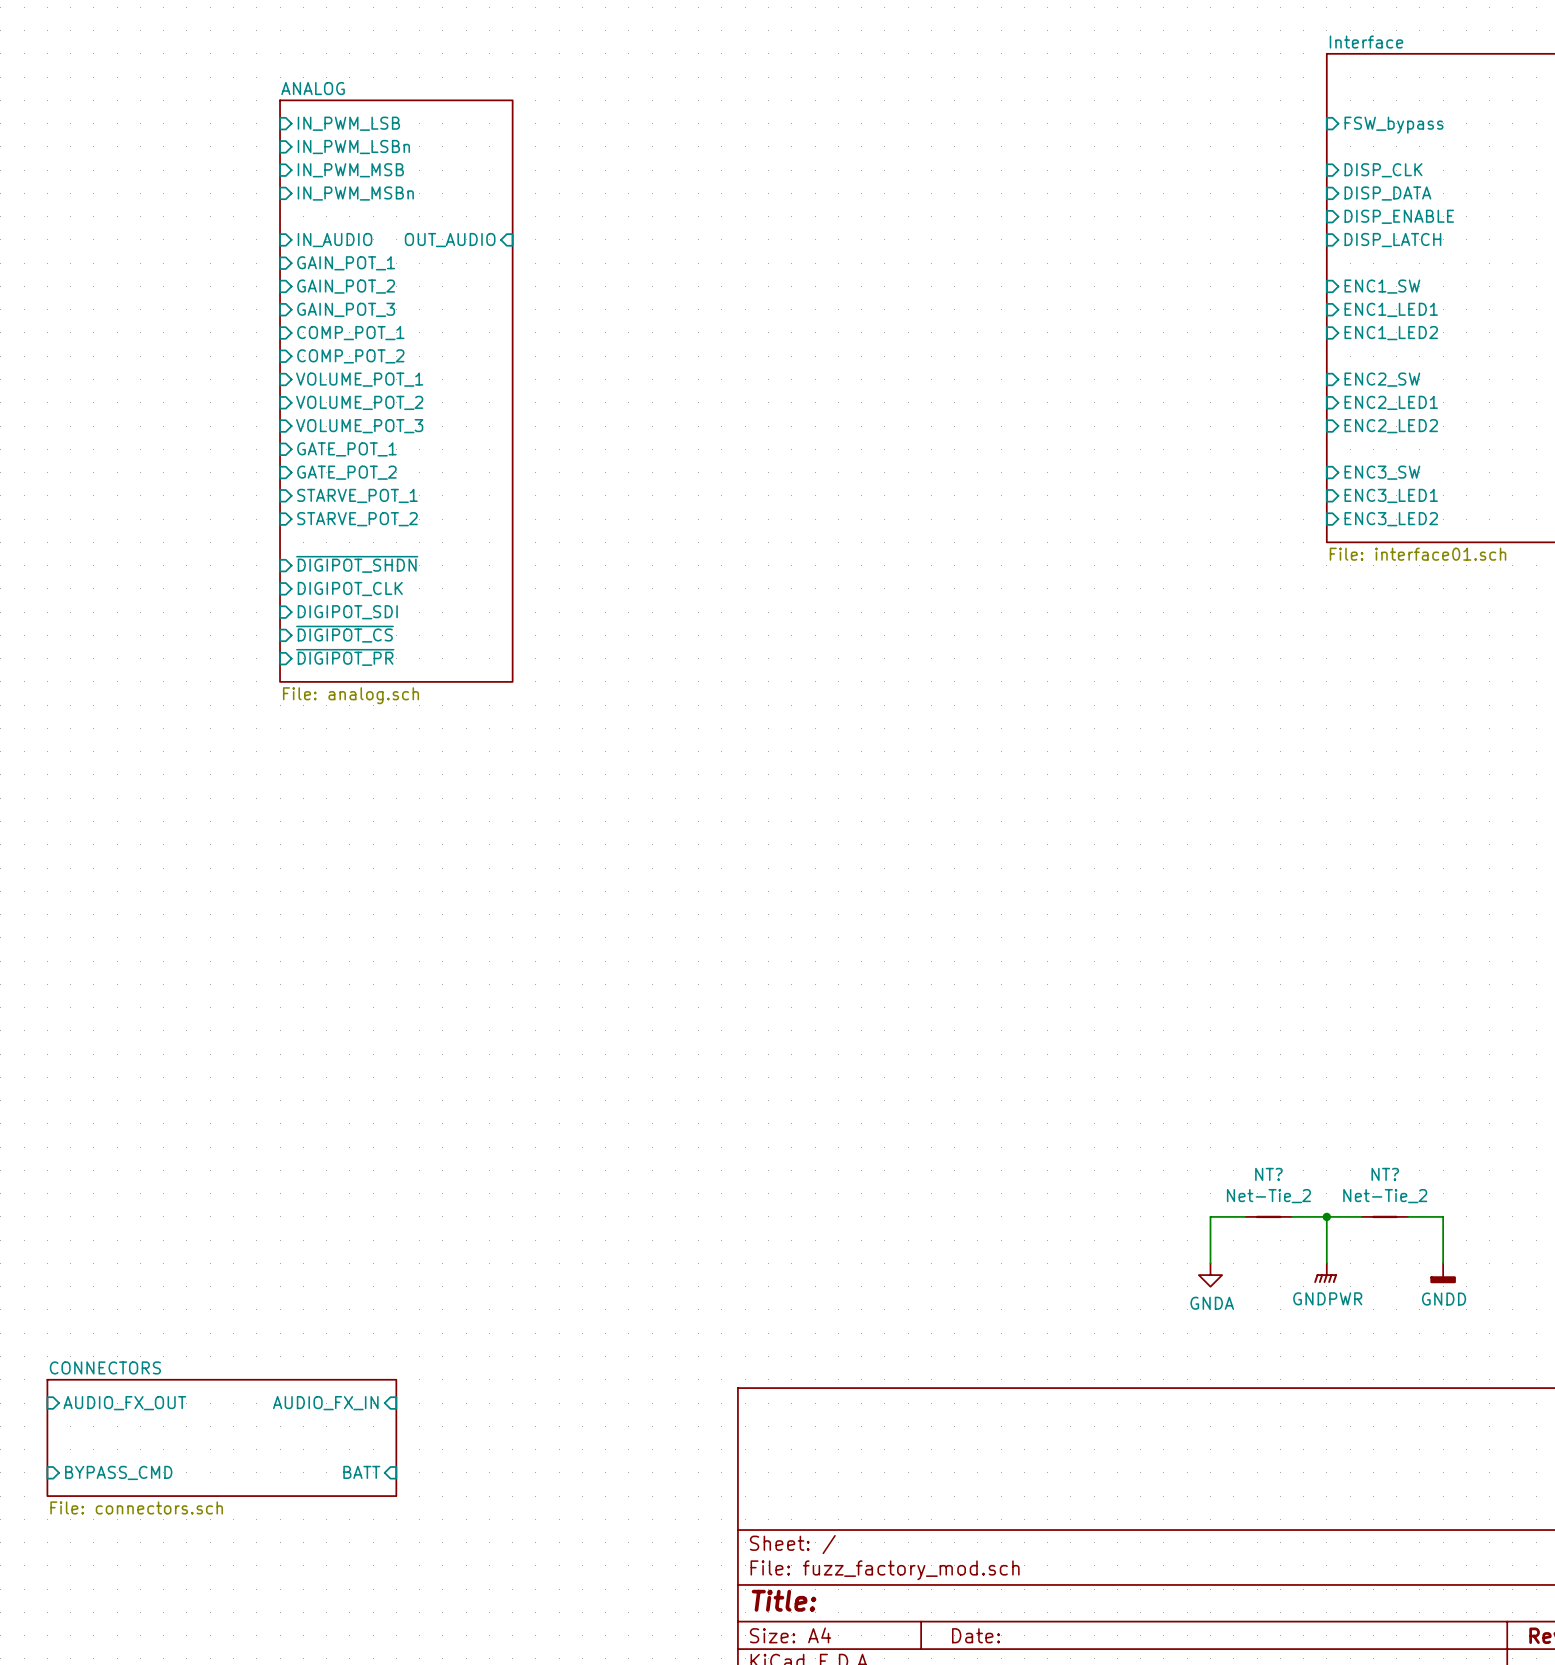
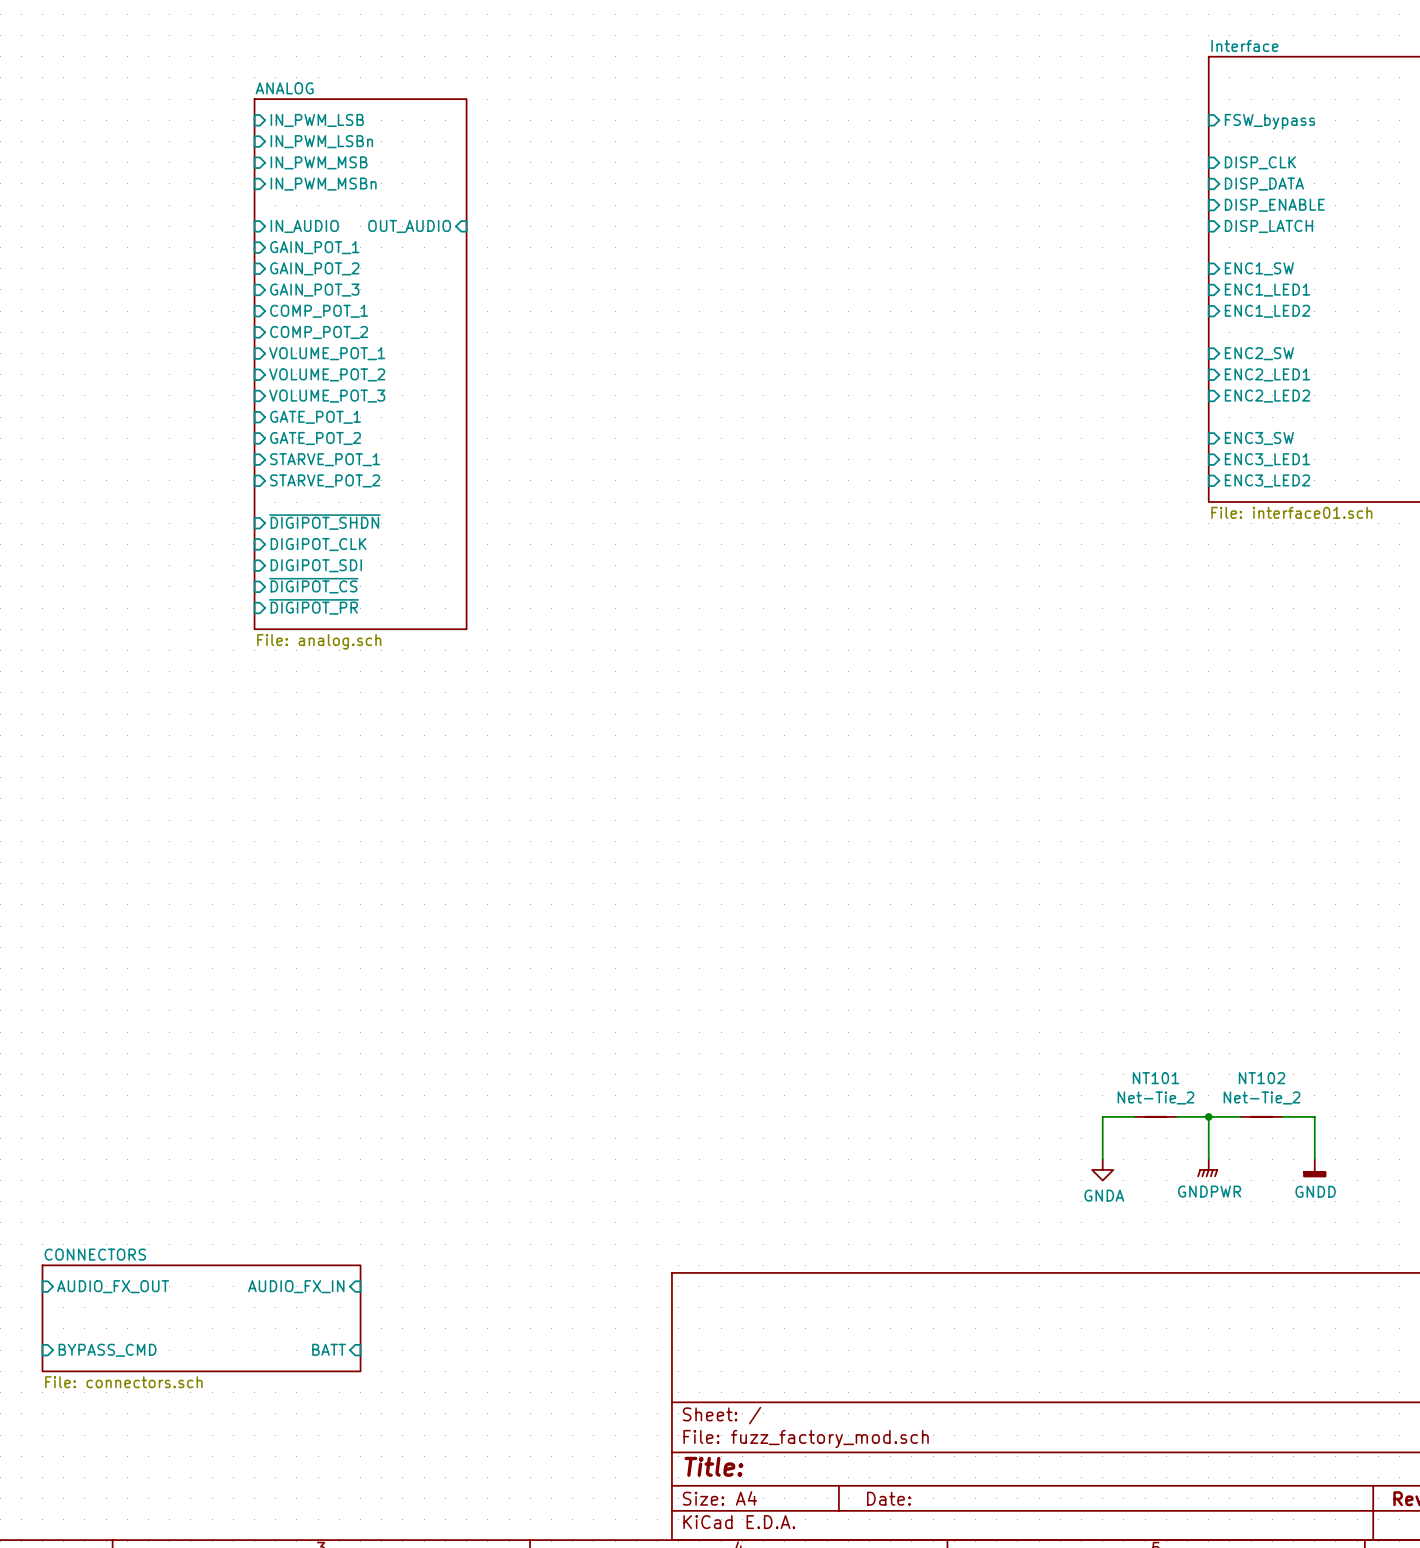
NT? name: NT? (1268, 1174) -> NT101 (1155, 1078)
NT? name: NT? (1385, 1174) -> NT102 (1262, 1078)

